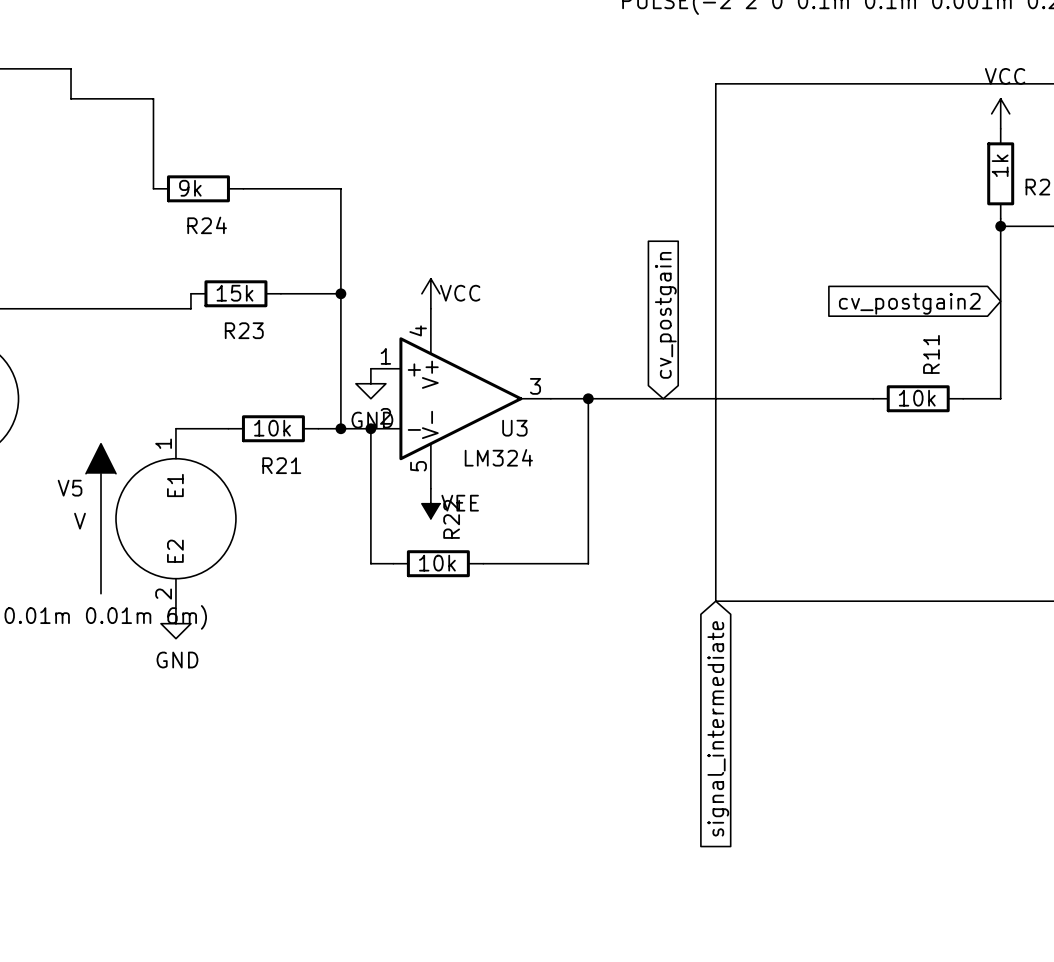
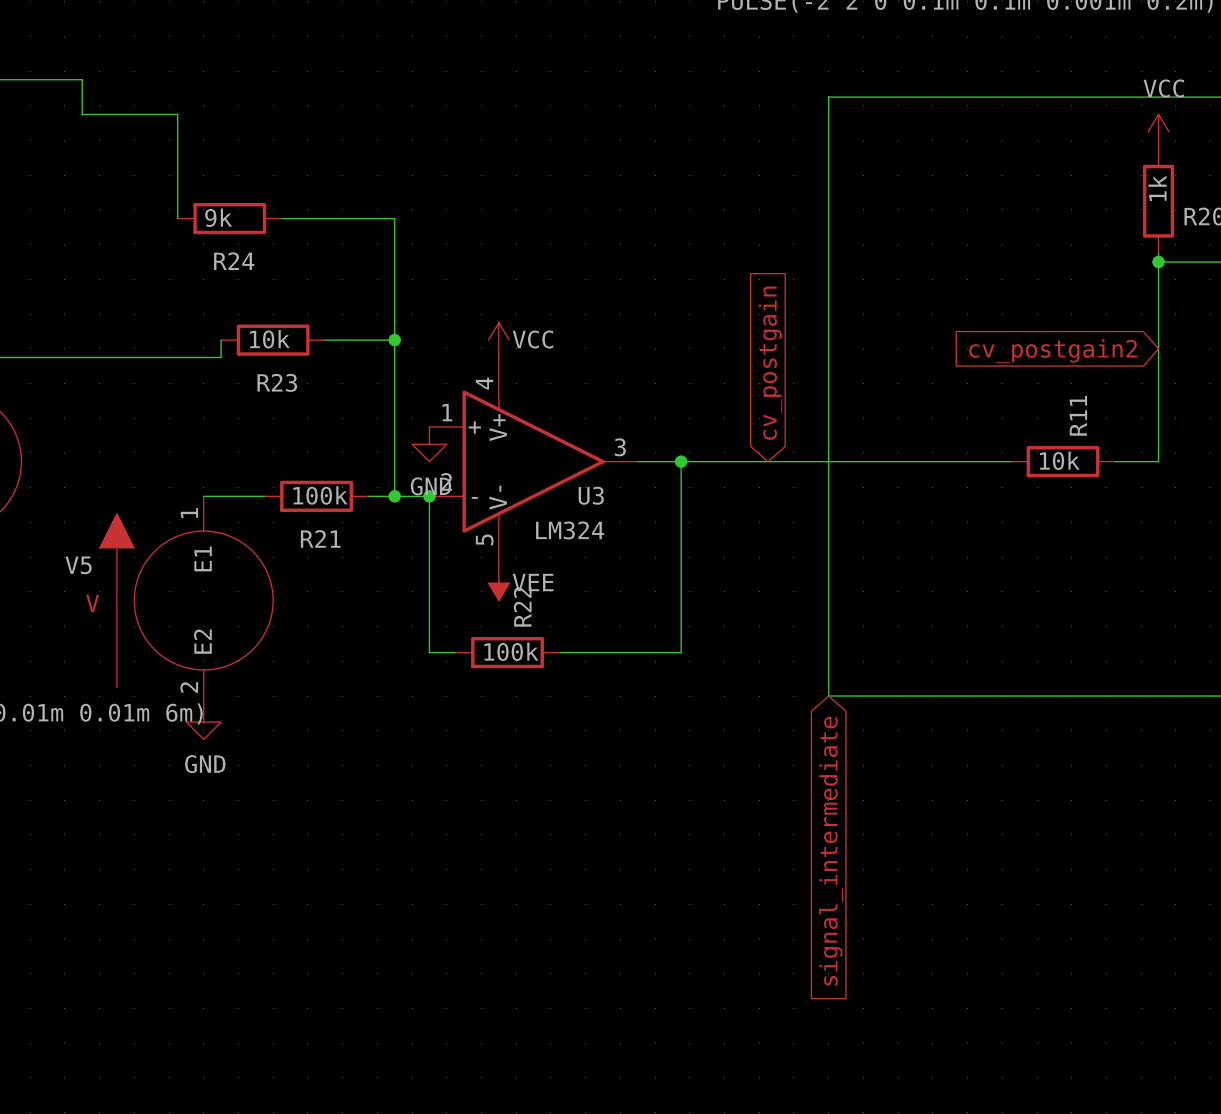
R23 value: 15k (234, 293) -> 10k (269, 339)
R21 value: 10k (272, 428) -> 100k (320, 495)
R22 value: 10k (437, 563) -> 100k (511, 651)

